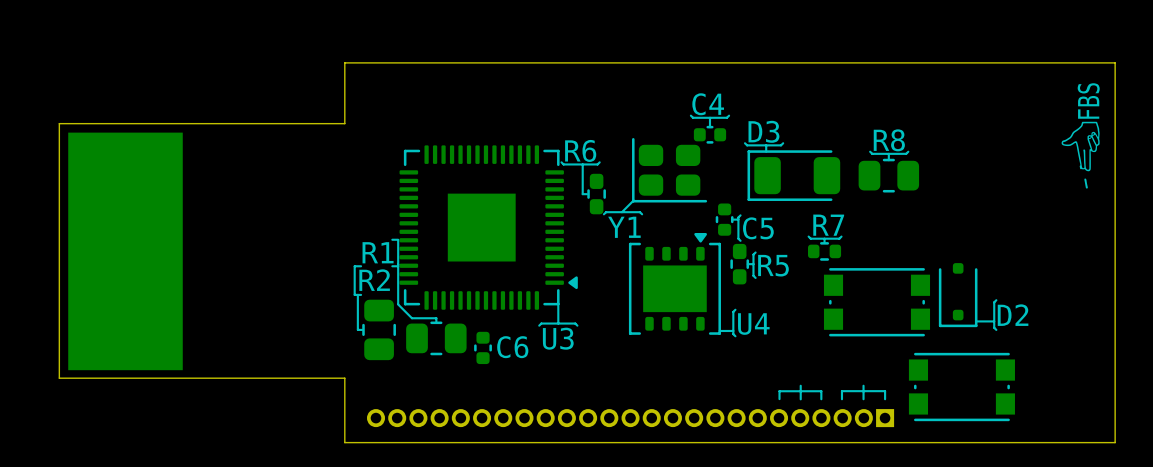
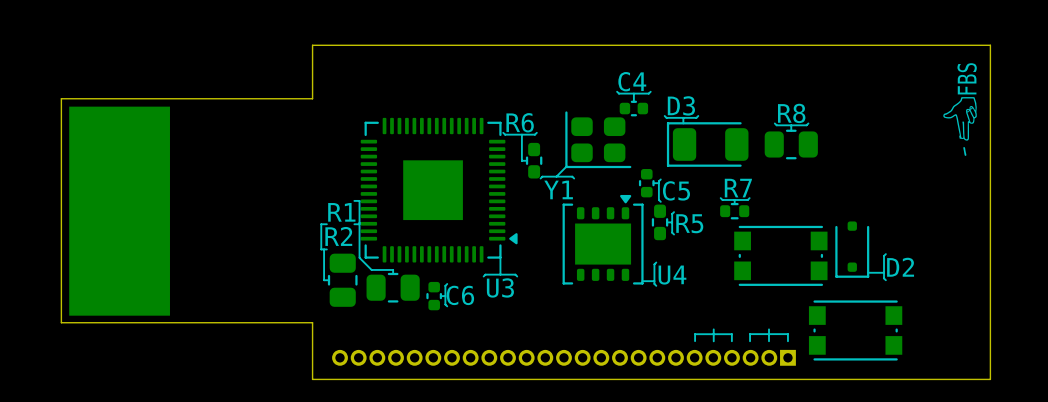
line: none -> (447, 283) (445, 285) (445, 304) (447, 306)
line: none -> (445, 296) (441, 296)

